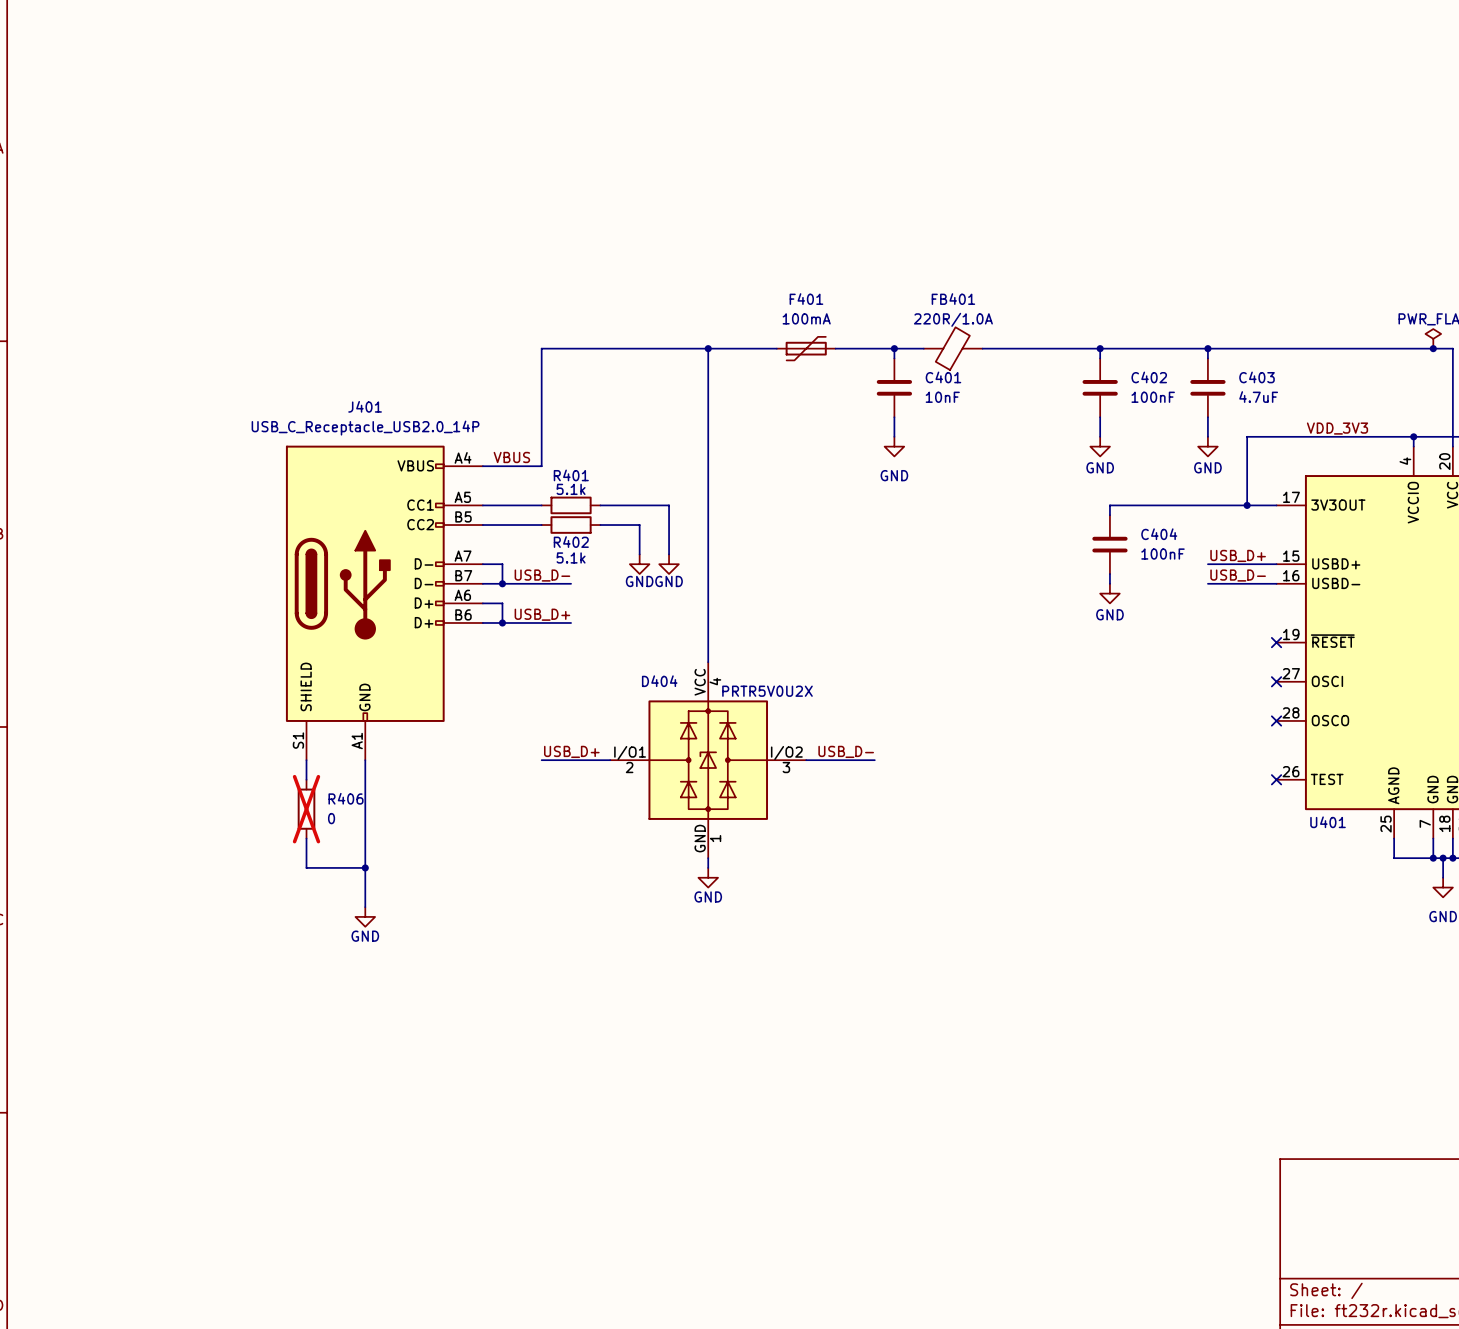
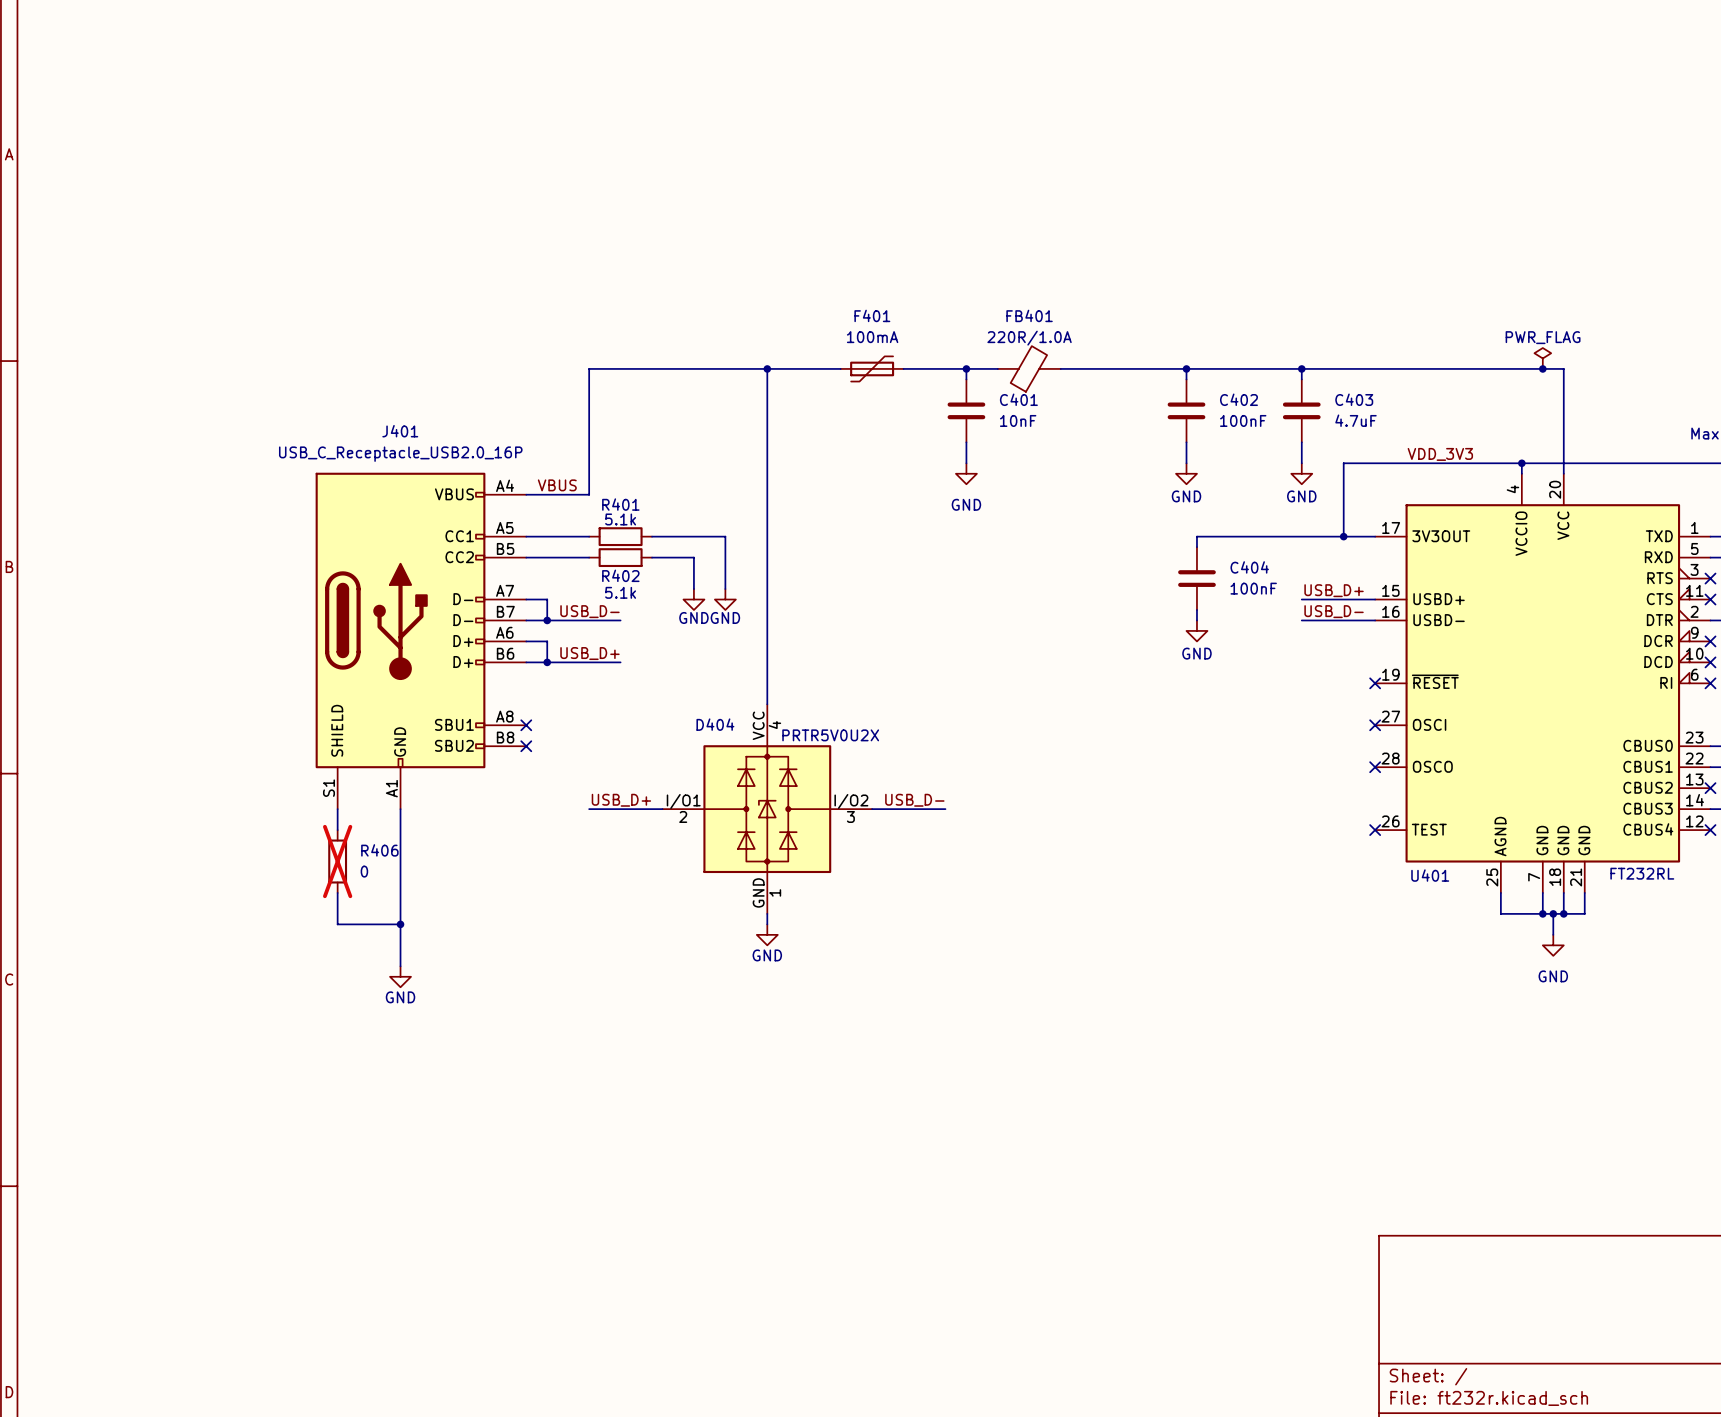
J401 value: USB_C_Receptacle_USB2.0_14P (365, 428) -> USB_C_Receptacle_USB2.0_16P (400, 454)
J401 symbol: [285, 445, 483, 761] -> [315, 472, 527, 810]
no-connect mark: none -> (526, 725)
no-connect mark: none -> (526, 746)

